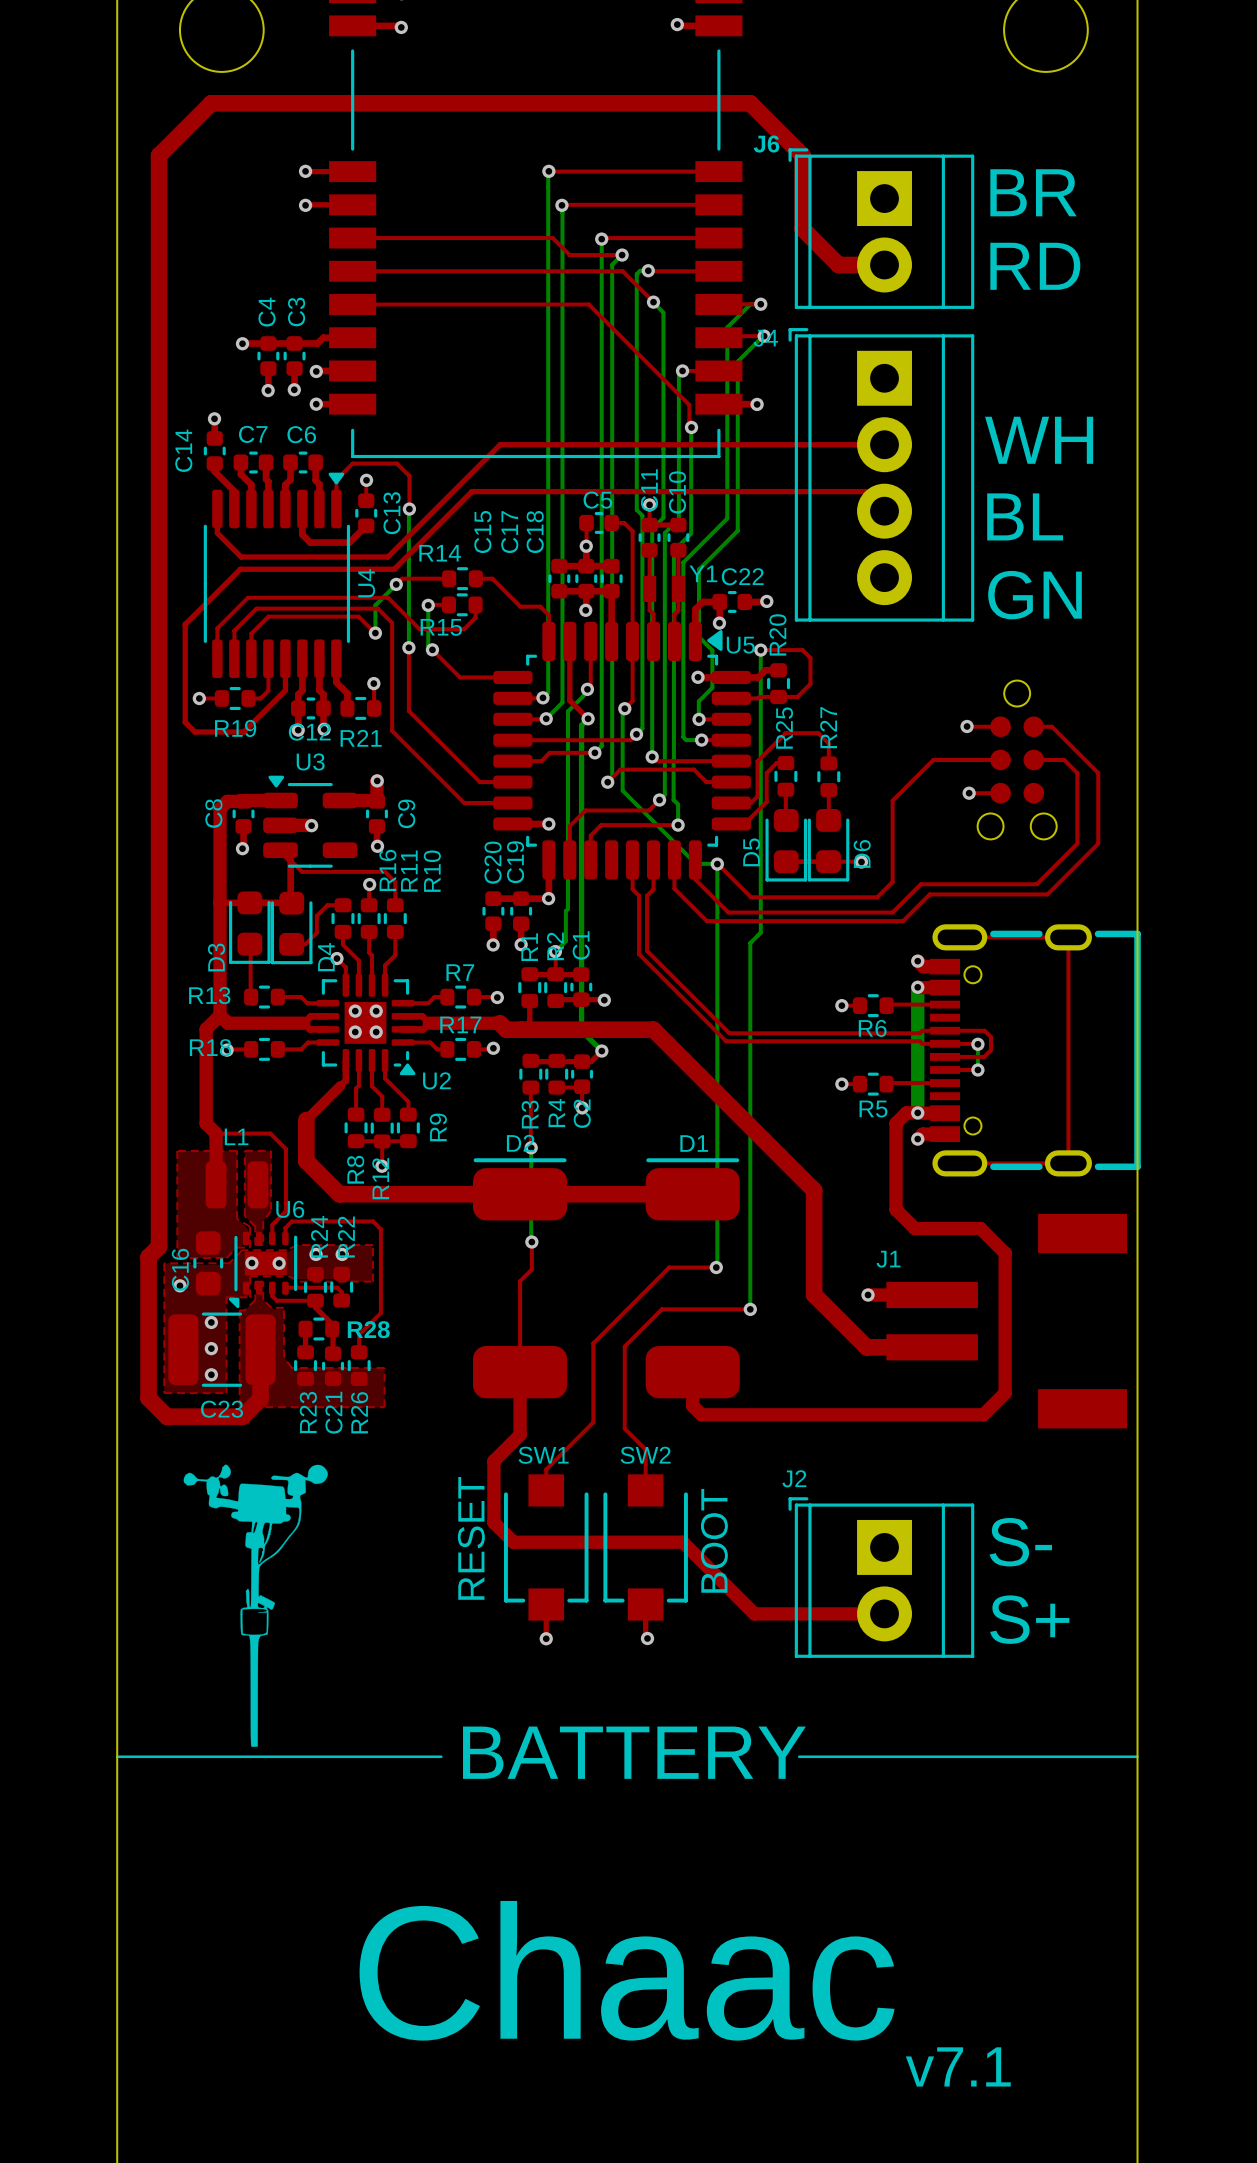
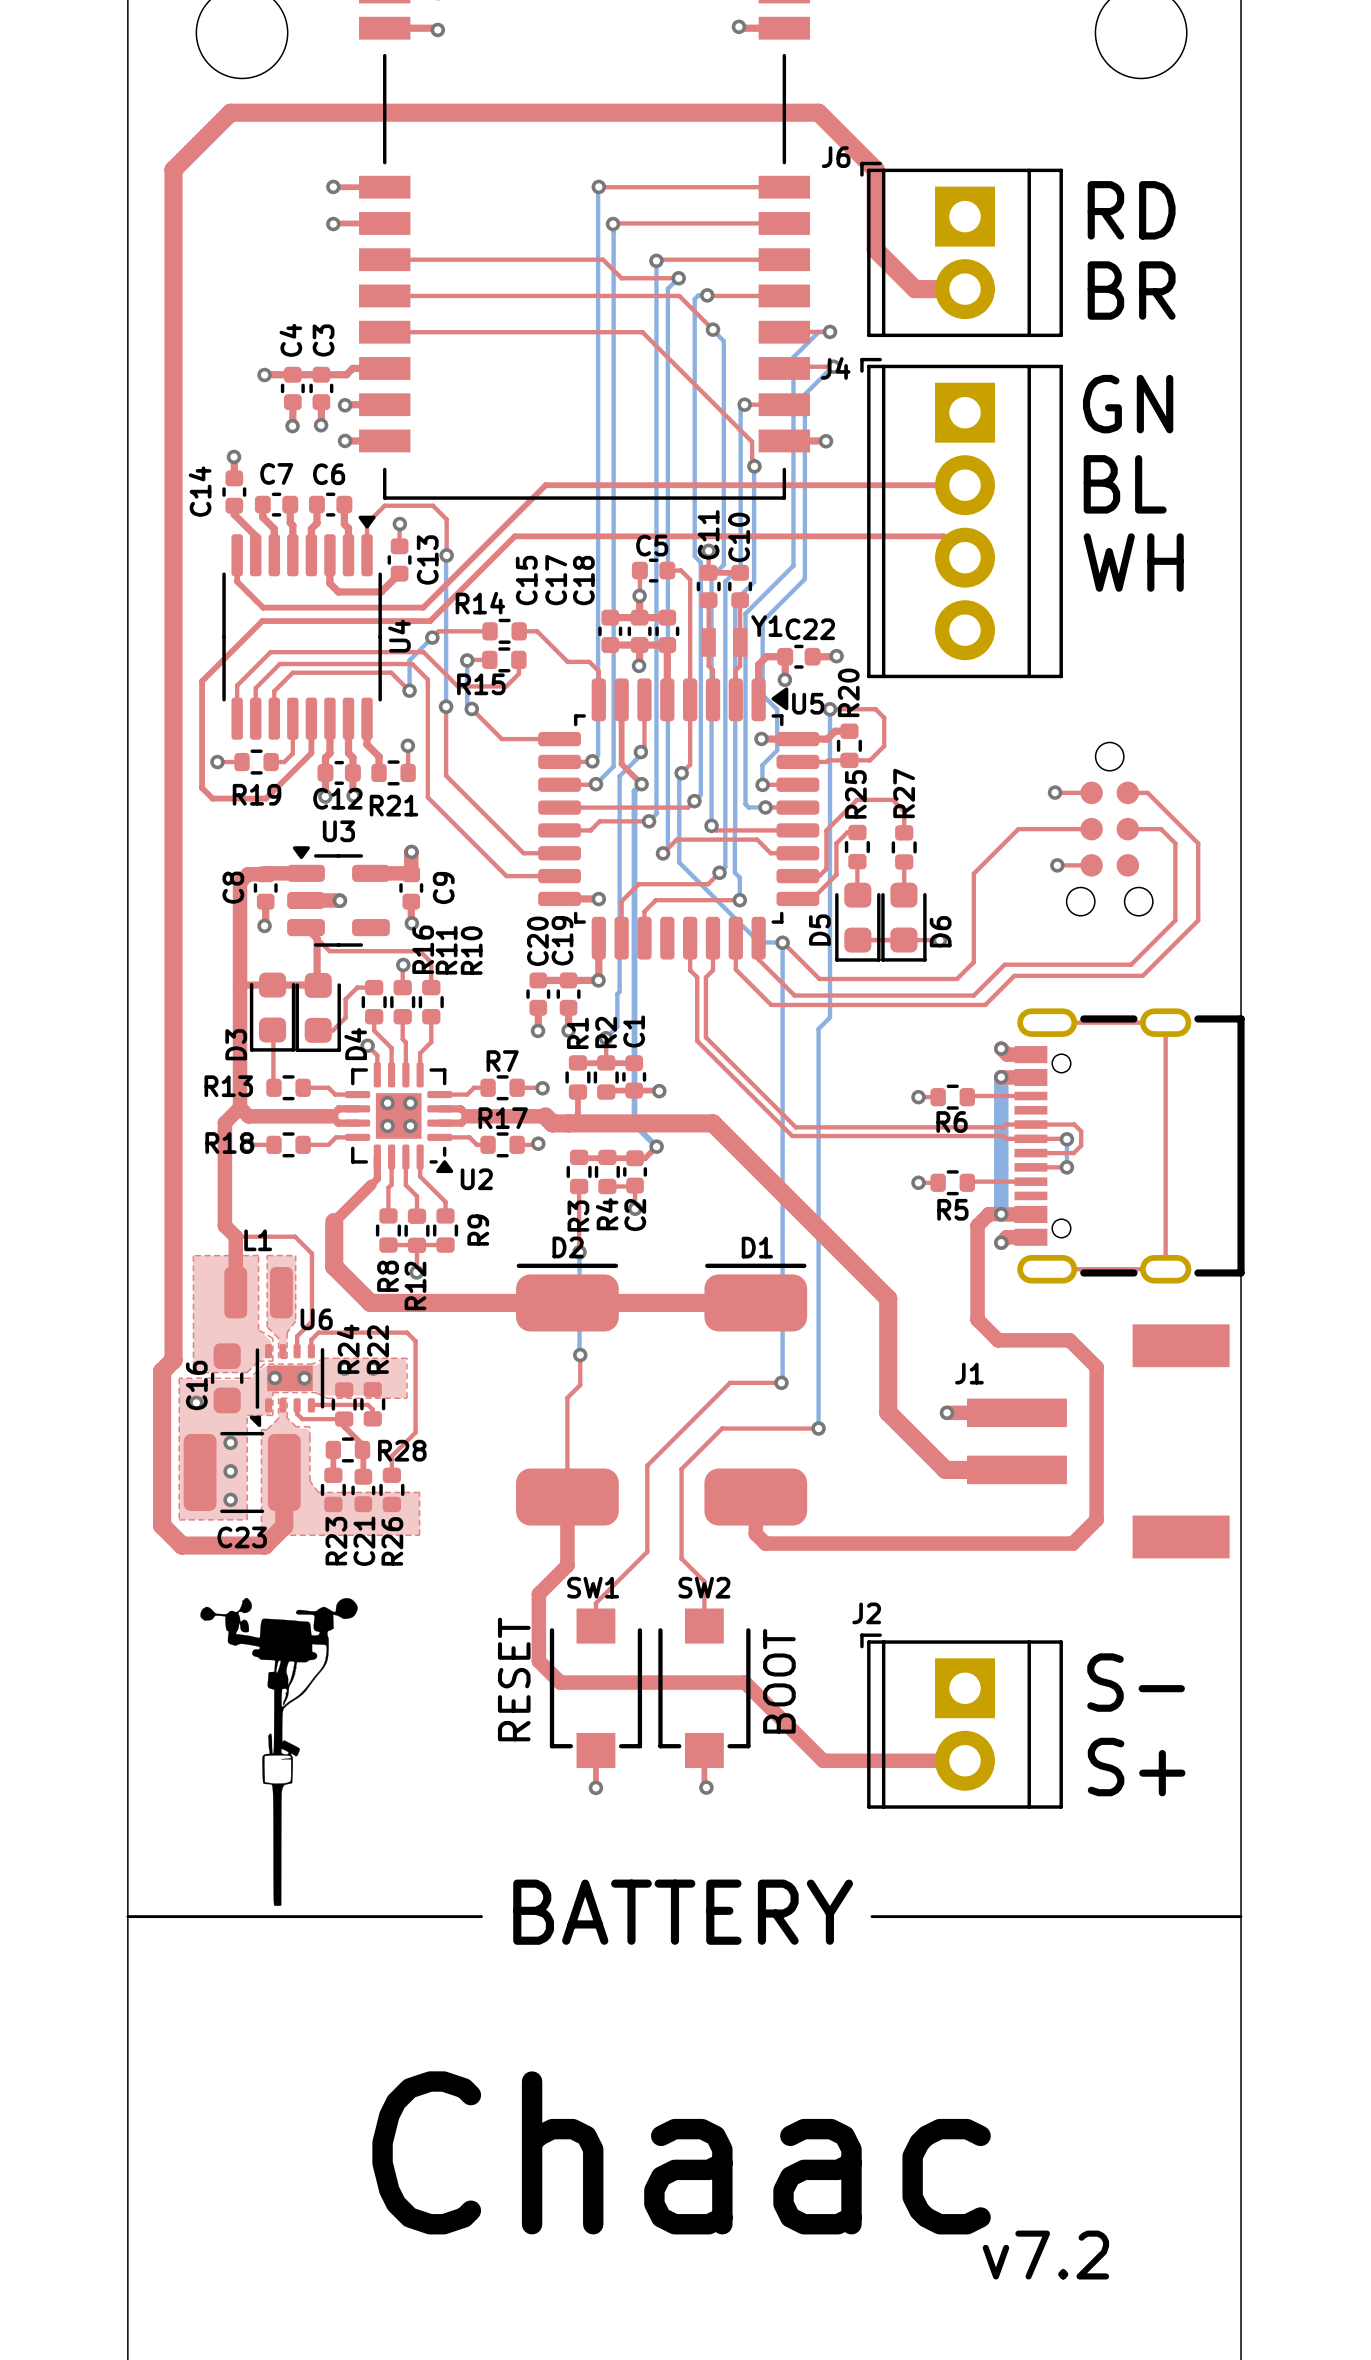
text: BR (1033, 192) -> RD (1131, 210)
text: RD (1035, 266) -> BR (1131, 290)
text position: WH (1039, 440) -> WH (1133, 562)
text position: BL (1025, 516) -> BL (1125, 484)
text position: GN (1034, 595) -> GN (1128, 404)
text: v7.1 (958, 2066) -> v7.2 (1045, 2255)

